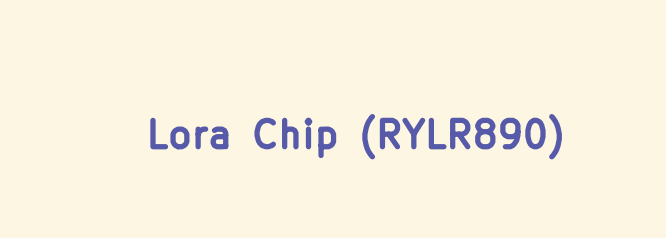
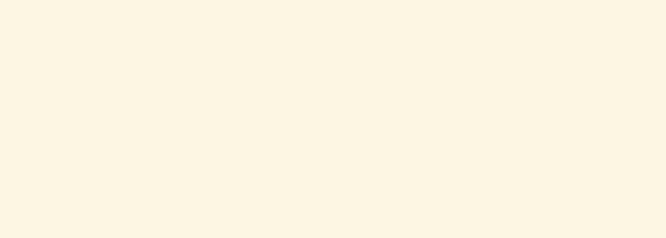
text: Lora Chip (RYLR890) (356, 136) -> none

